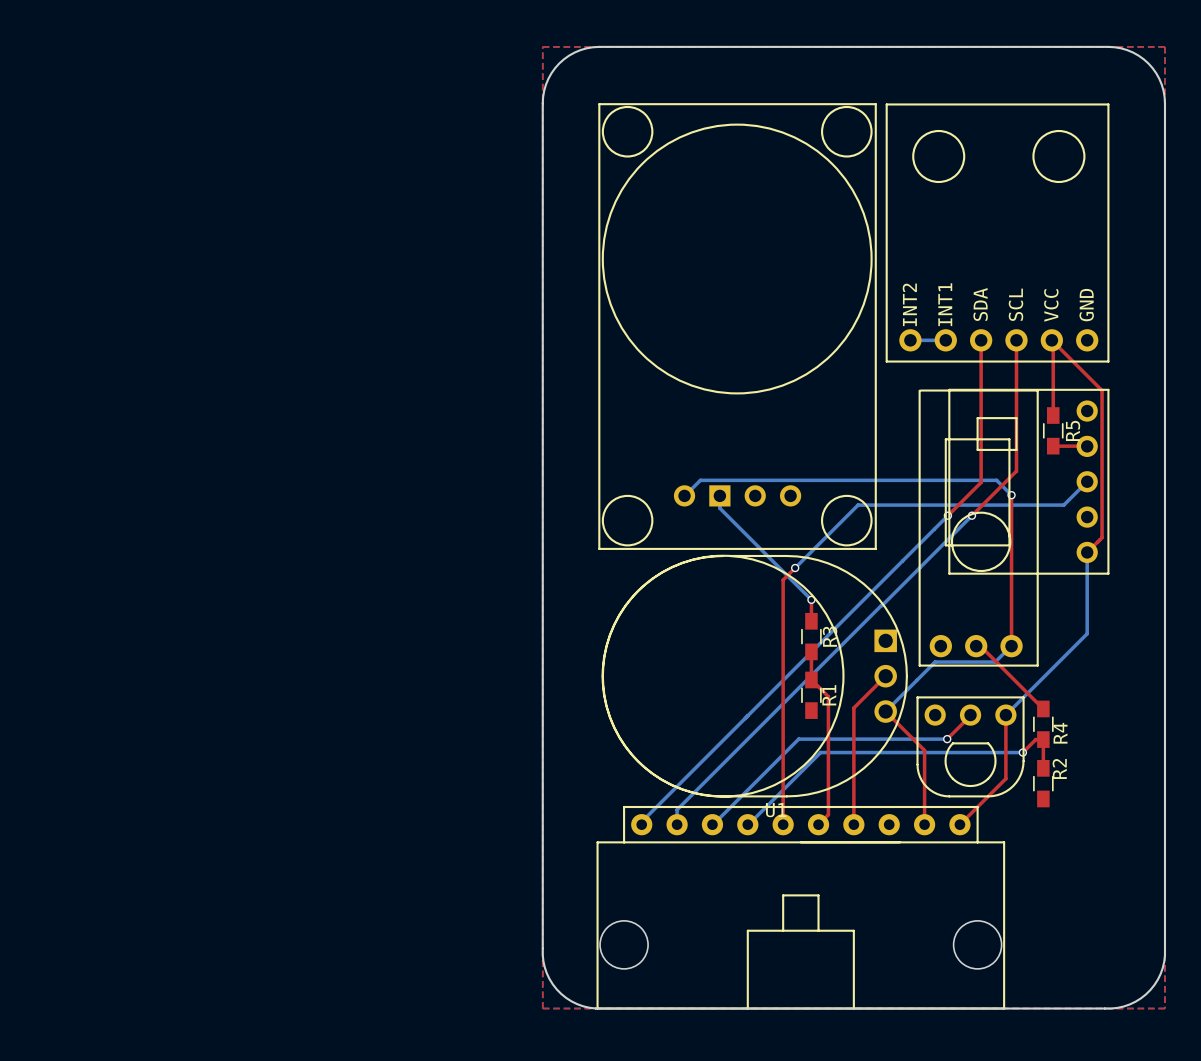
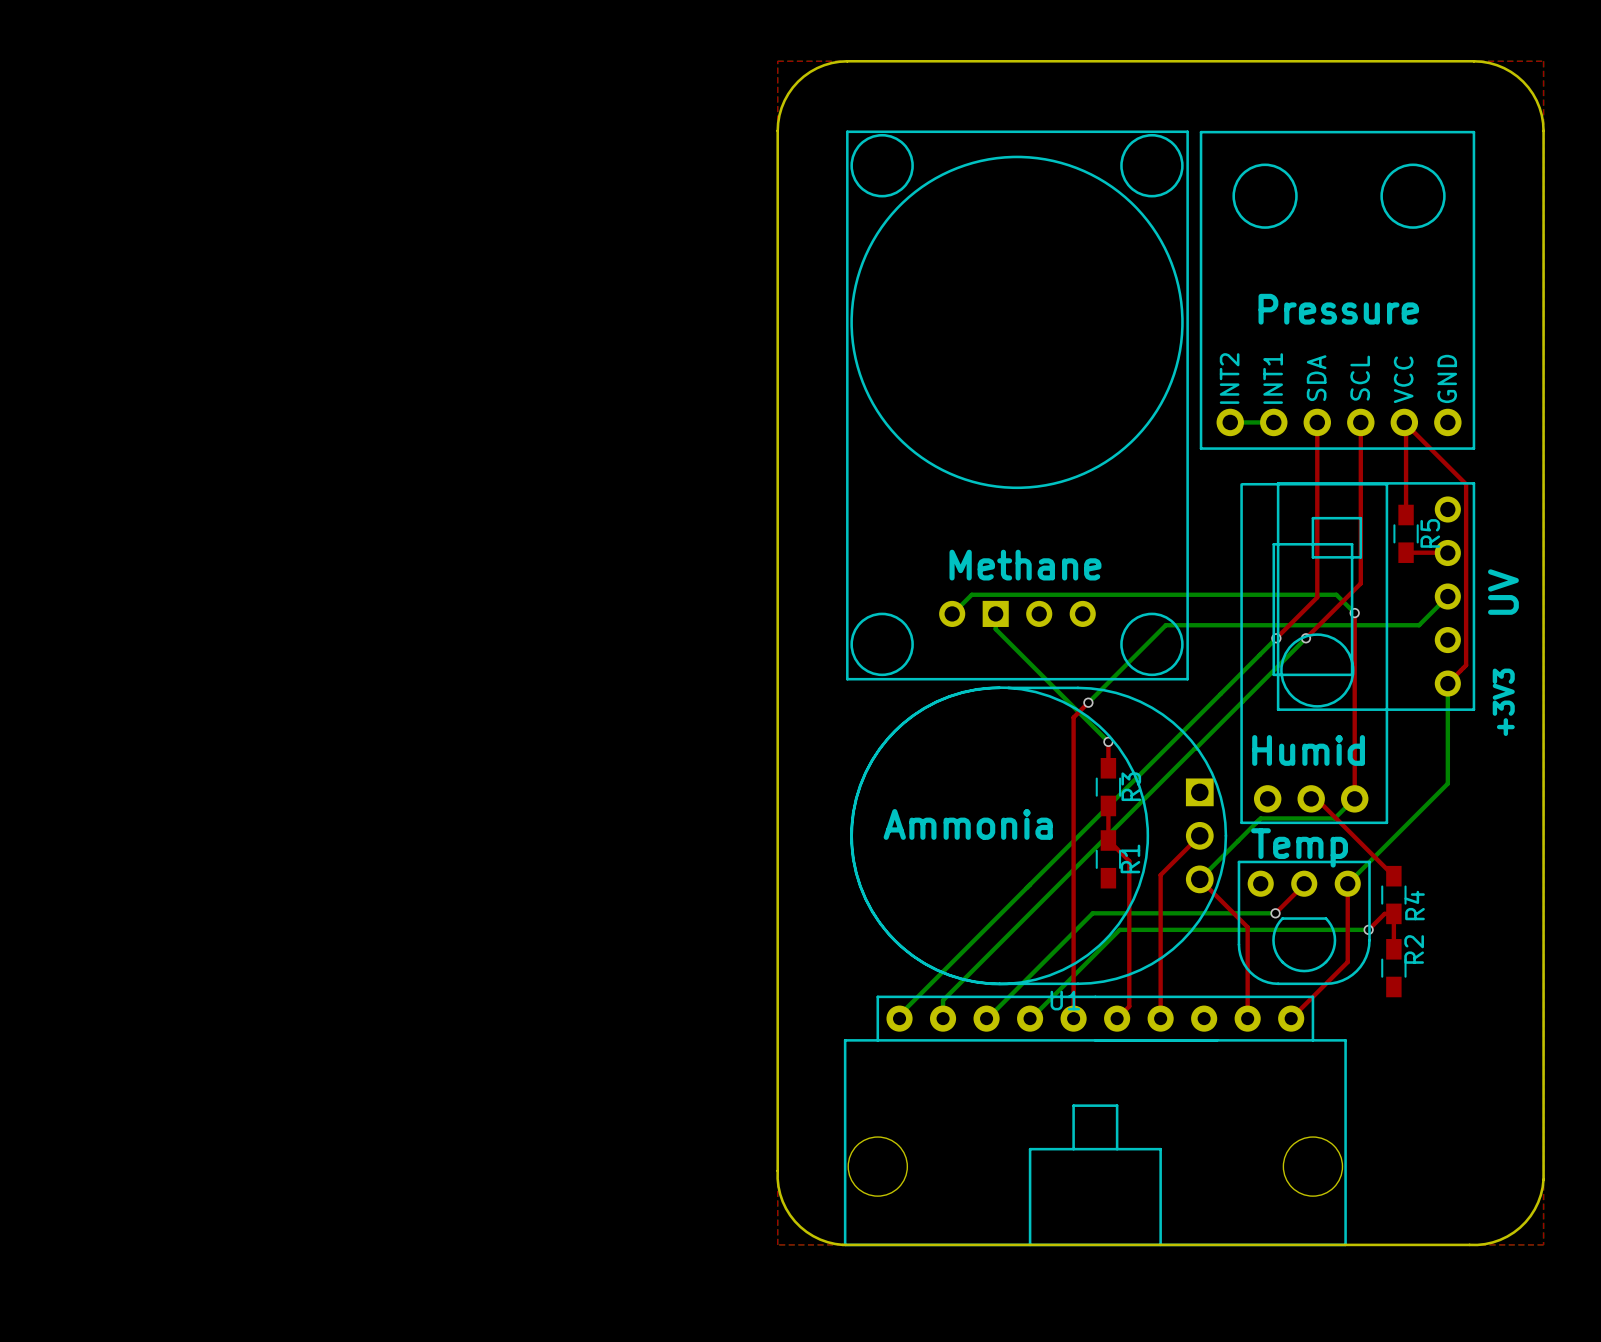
text: none -> Pressure (1338, 309)
text: none -> Methane (1025, 565)
text: none -> UV (1503, 592)
text: none -> +3V3 (1503, 702)
text: none -> Humid (1308, 750)
text: none -> Ammonia (968, 824)
text: none -> Temp (1299, 847)

